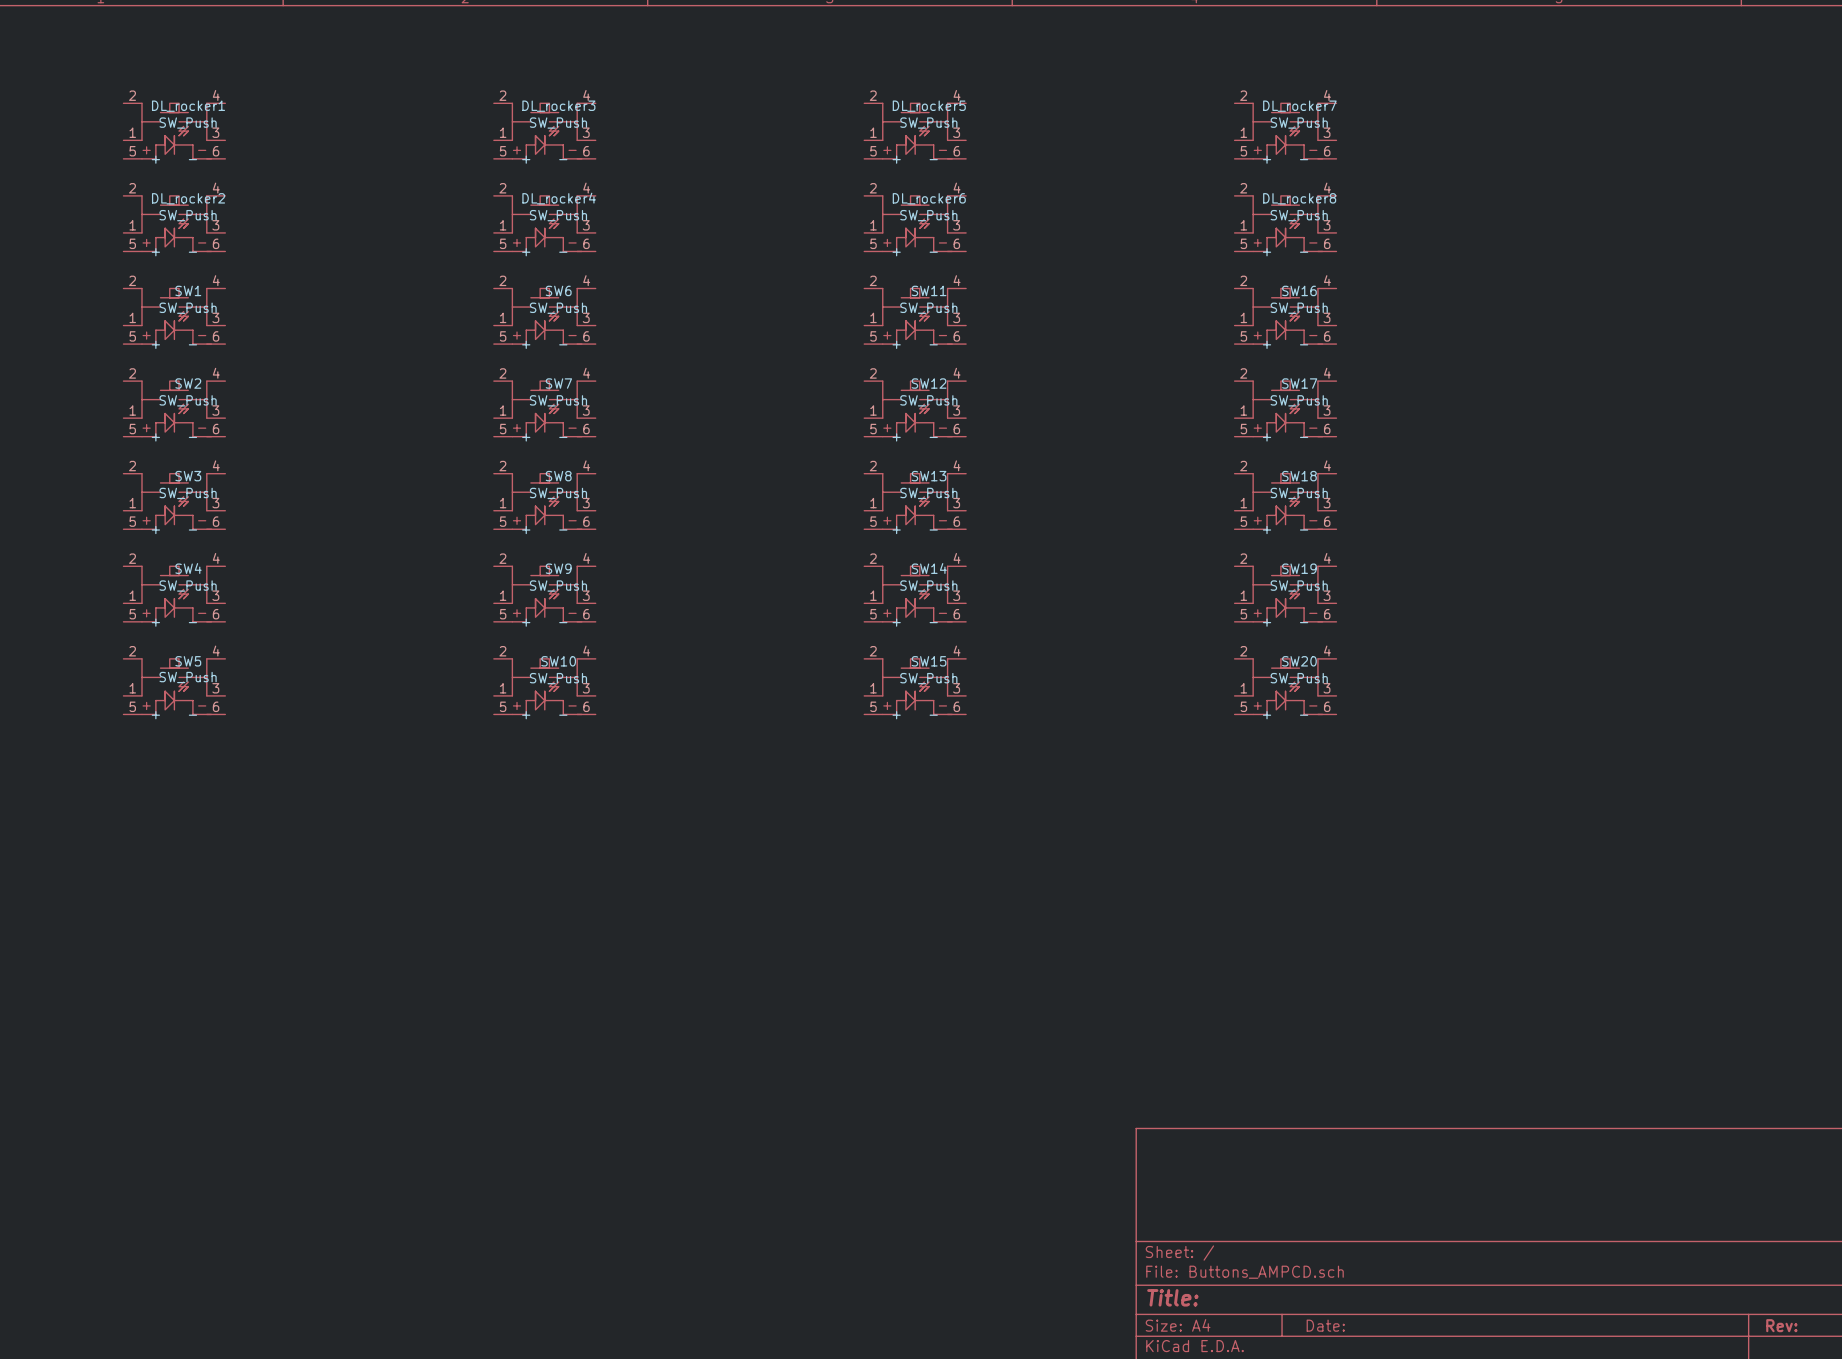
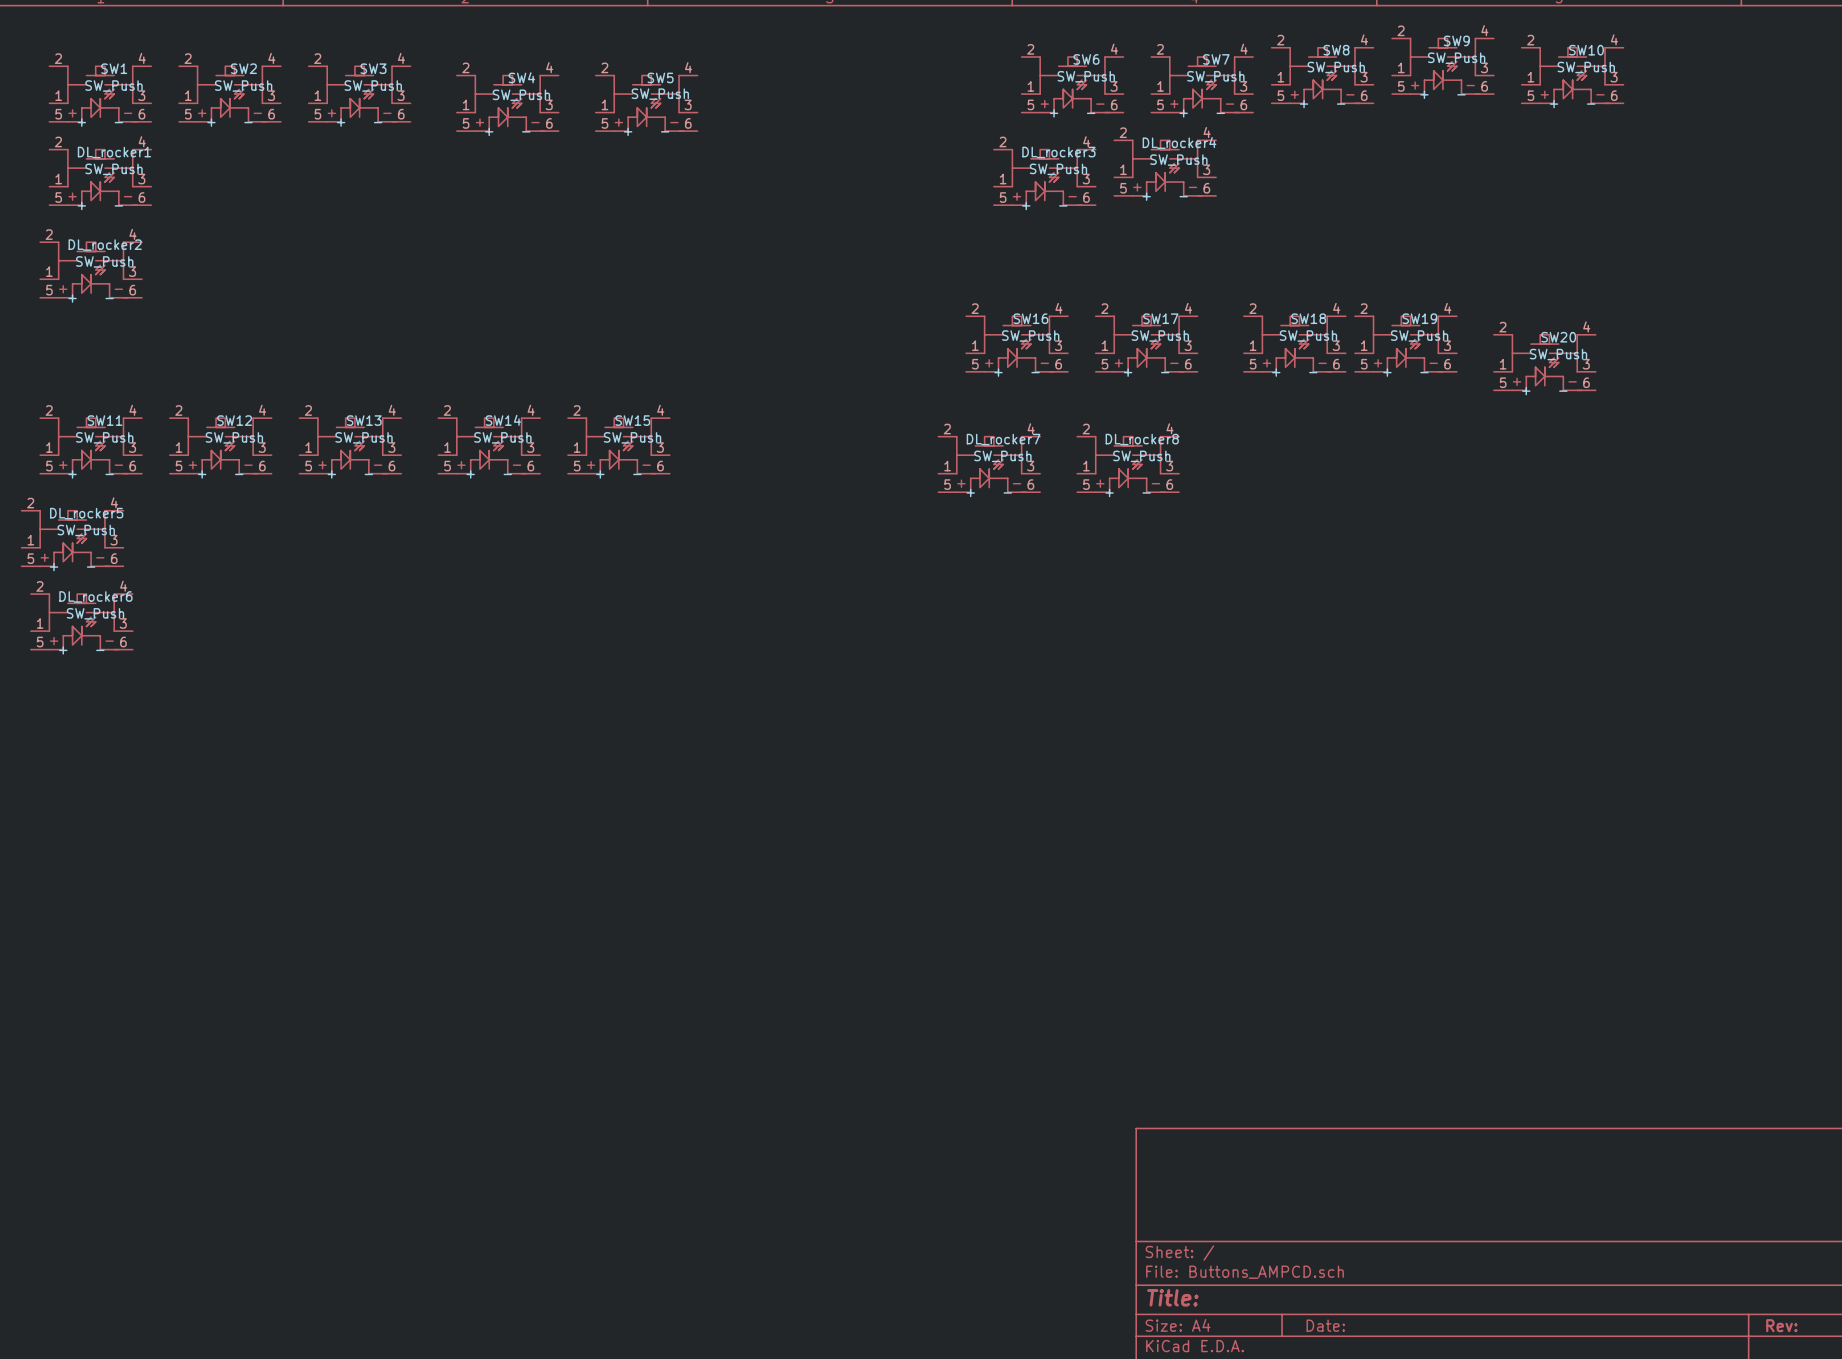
DL_rocker1 position: (174, 131) -> (100, 177)
DL_rocker3 position: (544, 131) -> (1044, 177)
DL_rocker5 position: (915, 131) -> (72, 538)
DL_rocker7 position: (1285, 131) -> (989, 464)
DL_rocker2 position: (174, 223) -> (91, 269)
DL_rocker4 position: (544, 223) -> (1165, 168)
DL_rocker6 position: (915, 223) -> (81, 621)
DL_rocker8 position: (1285, 223) -> (1128, 464)
SW1 position: (174, 316) -> (100, 94)
SW6 position: (544, 316) -> (1072, 84)
SW11 position: (915, 316) -> (91, 445)
SW16 position: (1285, 316) -> (1017, 344)
SW2 position: (174, 408) -> (229, 94)
SW7 position: (544, 408) -> (1202, 84)
SW12 position: (915, 408) -> (220, 445)
SW17 position: (1285, 408) -> (1146, 344)
SW3 position: (174, 501) -> (359, 94)
SW8 position: (544, 501) -> (1322, 75)
SW13 position: (915, 501) -> (350, 445)
SW18 position: (1285, 501) -> (1294, 344)
SW4 position: (174, 594) -> (507, 103)
SW9 position: (544, 594) -> (1442, 66)
SW14 position: (915, 594) -> (489, 445)
SW19 position: (1285, 594) -> (1405, 344)
SW5 position: (174, 686) -> (646, 103)
SW10 position: (544, 686) -> (1572, 75)
SW15 position: (915, 686) -> (618, 445)
SW20 position: (1285, 686) -> (1544, 362)

